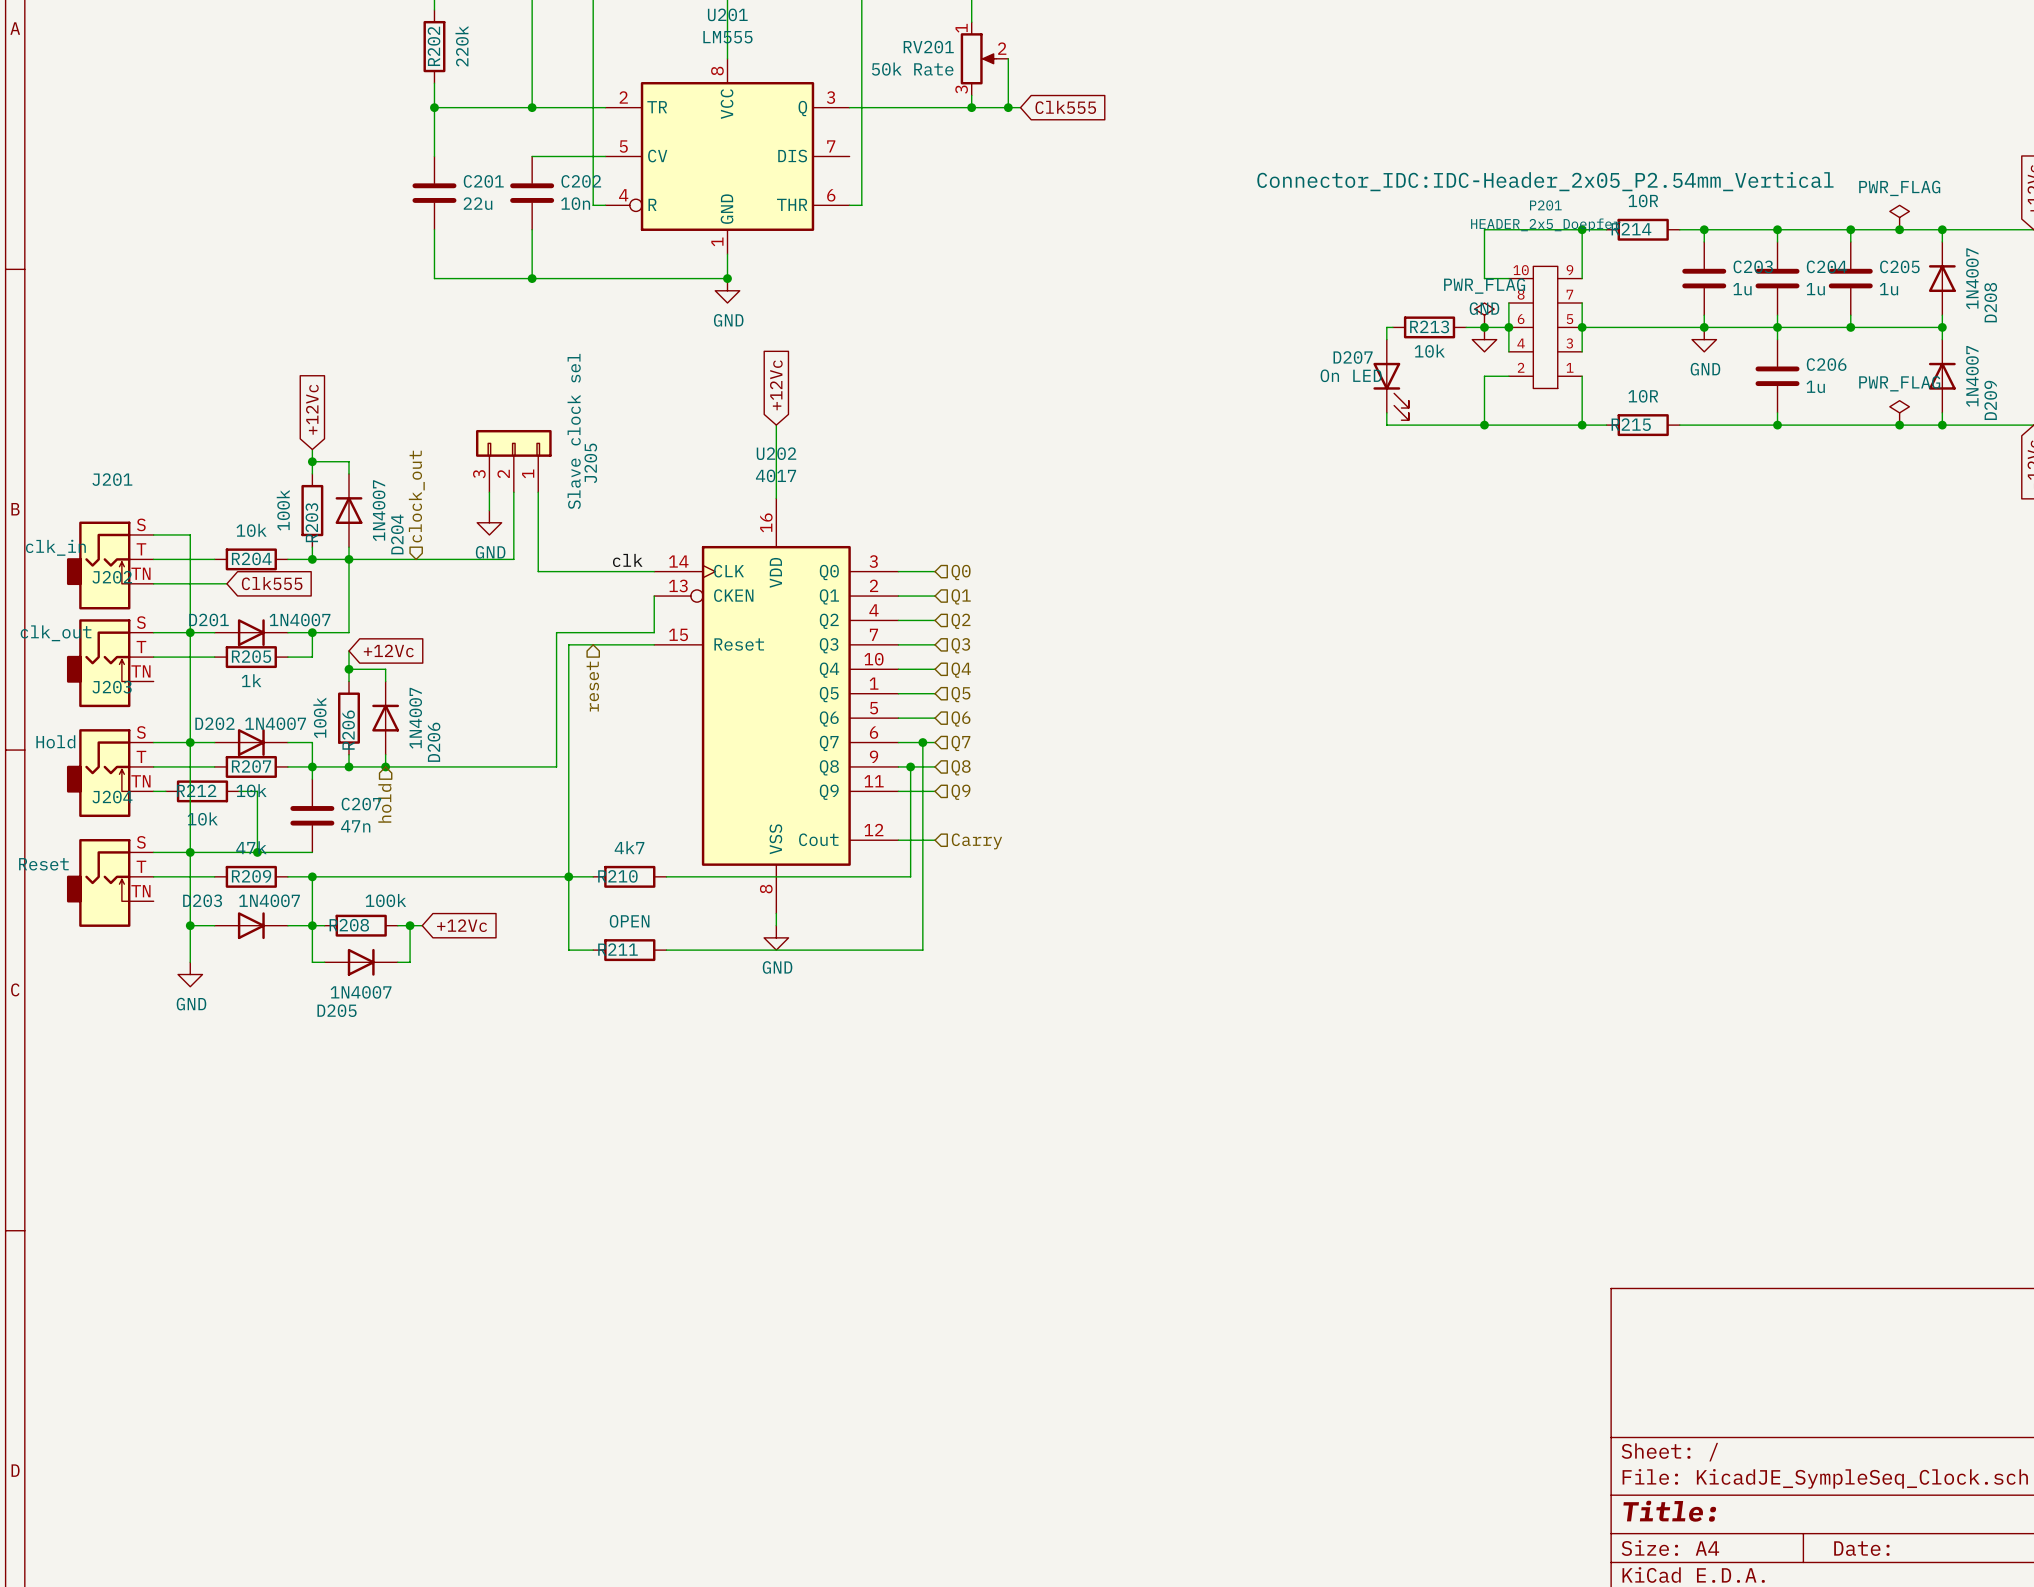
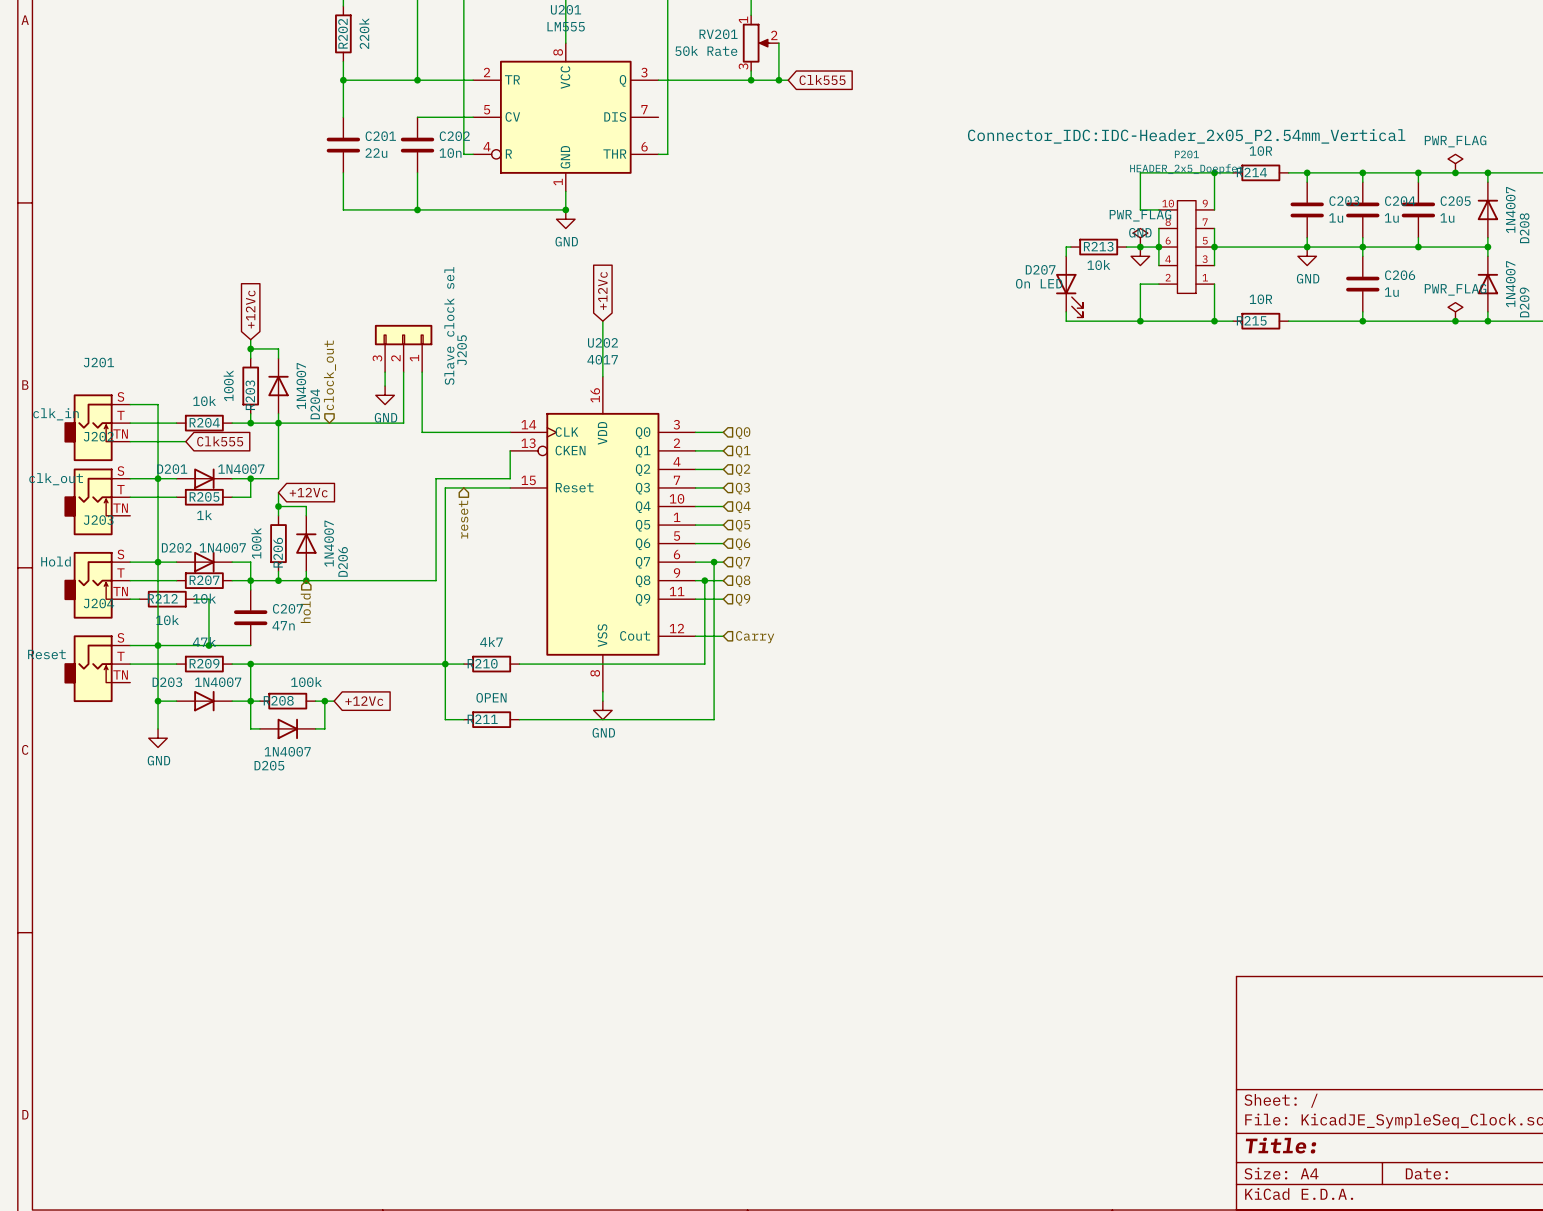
label: clk (627, 560) -> none

